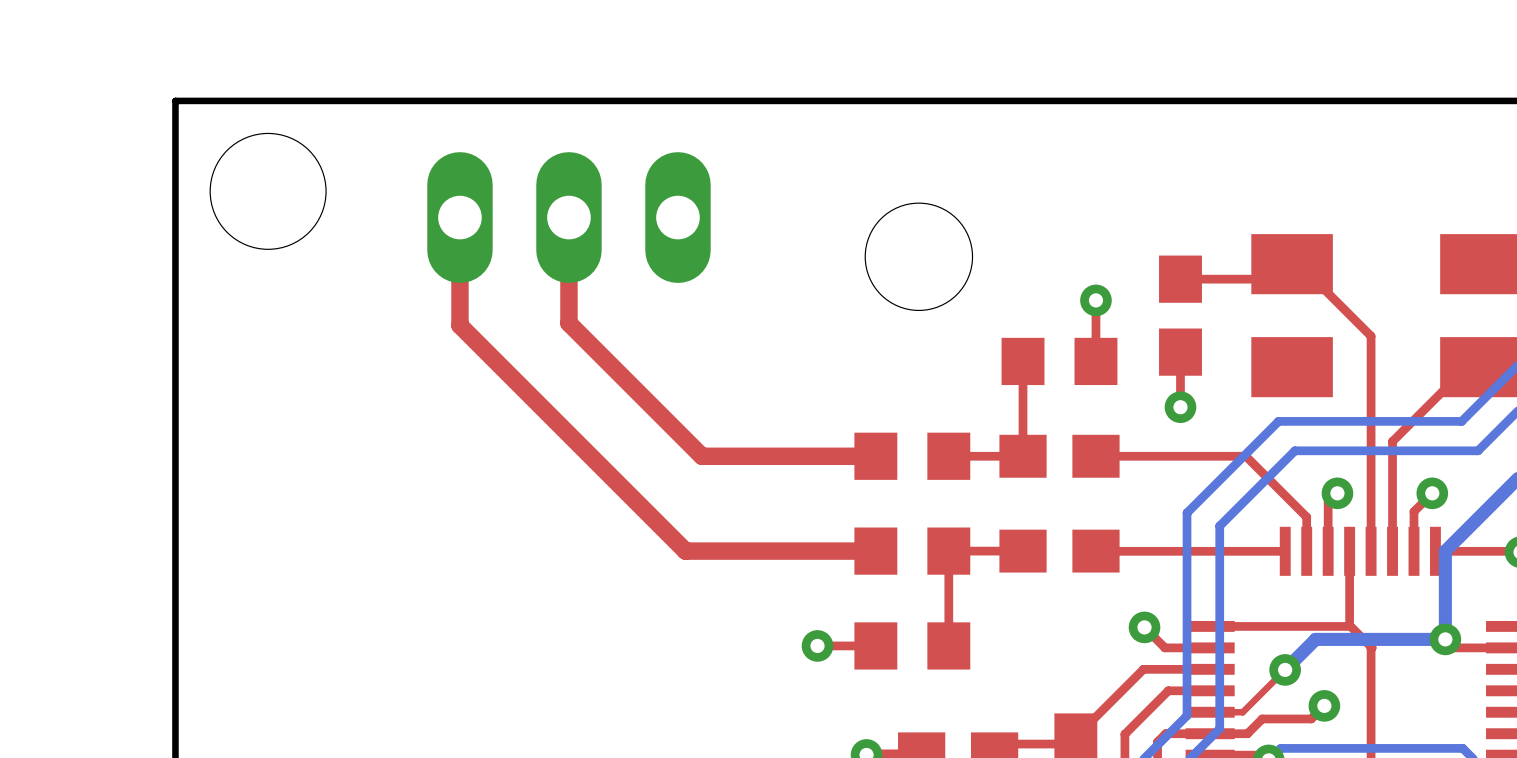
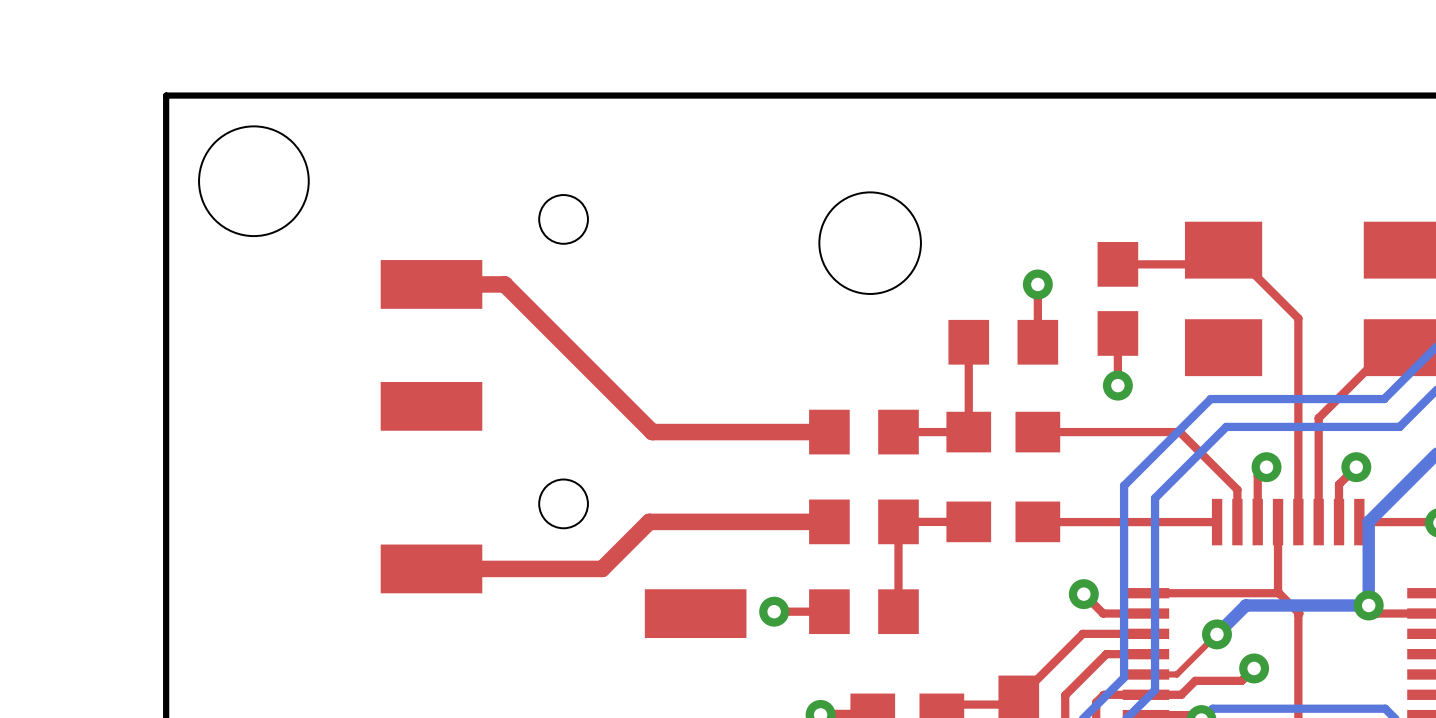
top track: (459, 217) (459, 325) (685, 551) -> (431, 568) (602, 568) (649, 521)
top track: (568, 217) (568, 323) (701, 456) -> (431, 284) (504, 284) (652, 432) (664, 432)
part: (568, 217) -> none
part: none -> (563, 416)

